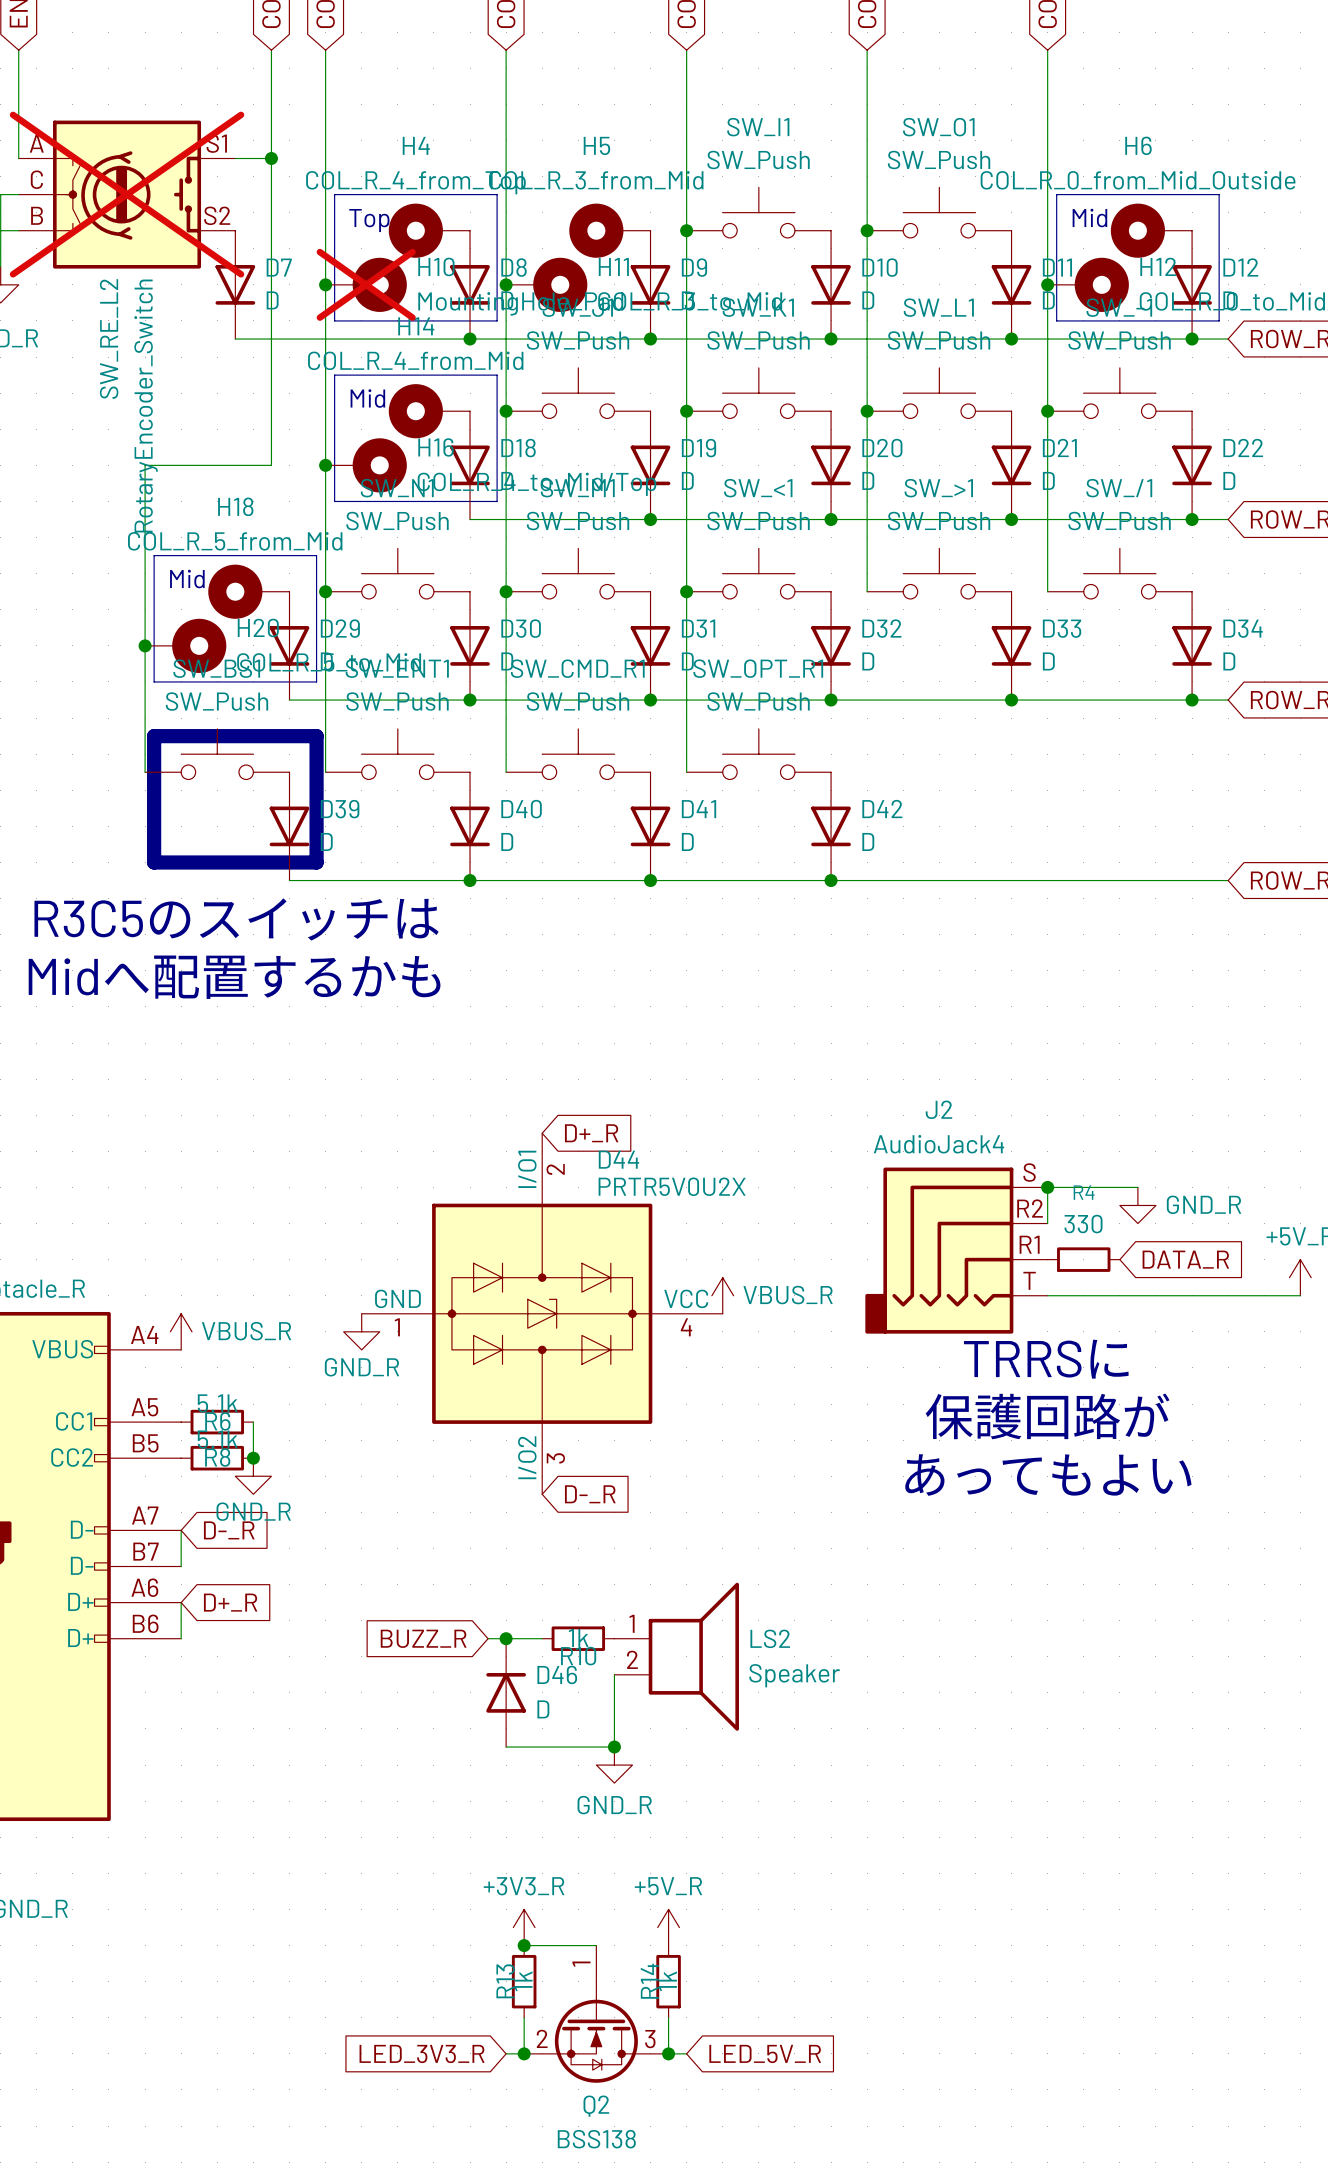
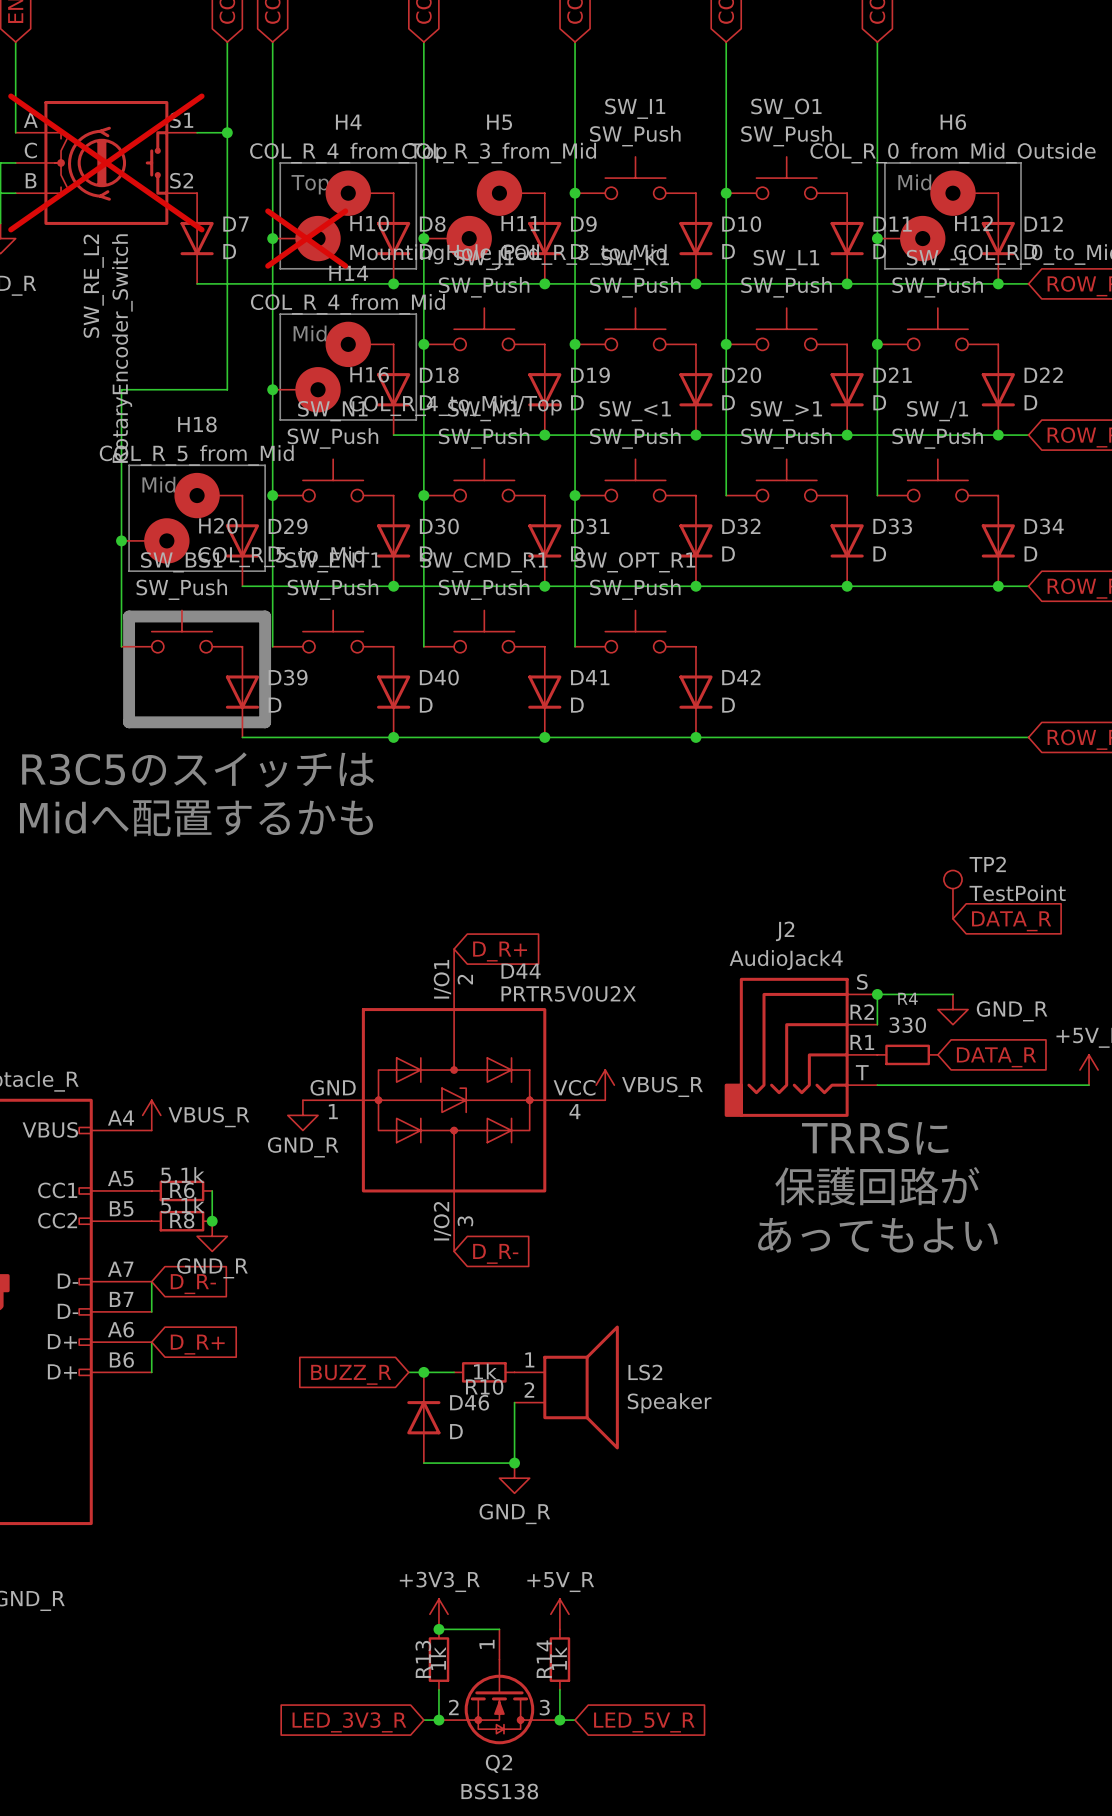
TP2: none -> TestPoint (952, 894)
global label: none -> DATA_R (1011, 921)
global label: D+_R (591, 1133) -> D_R+ (500, 951)
global label: D-_R (590, 1494) -> D_R- (495, 1253)
global label: D-_R (229, 1530) -> D_R- (193, 1284)
global label: D+_R (230, 1602) -> D_R+ (197, 1344)

